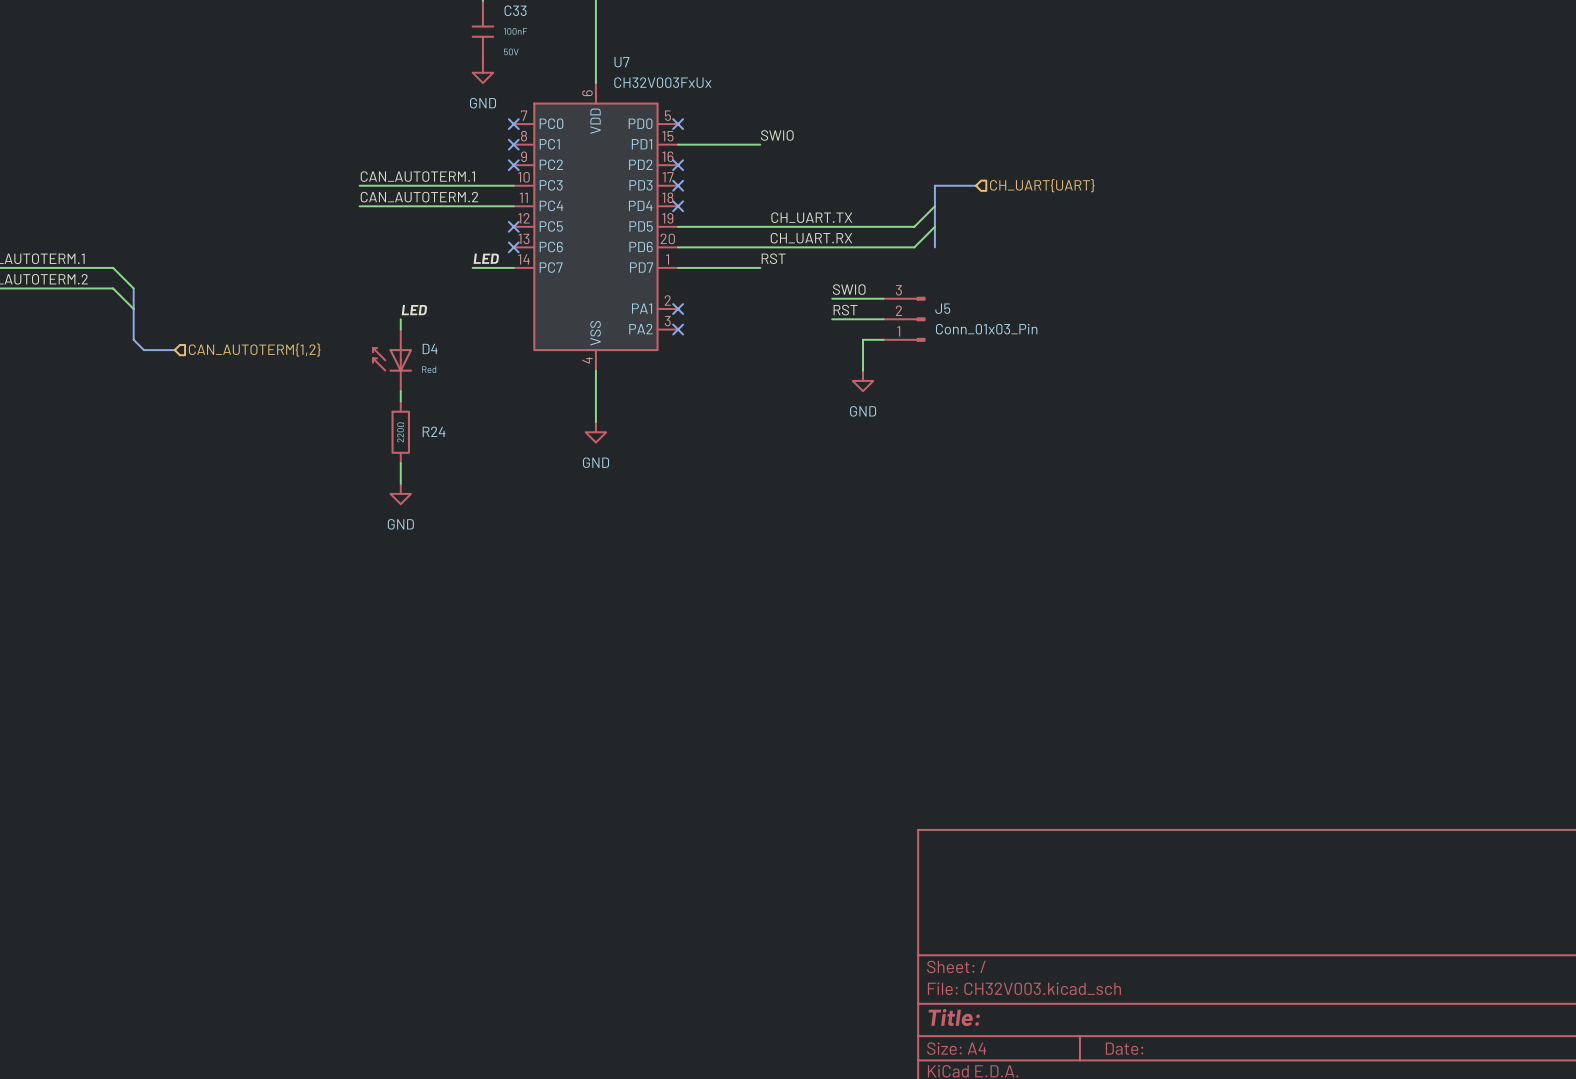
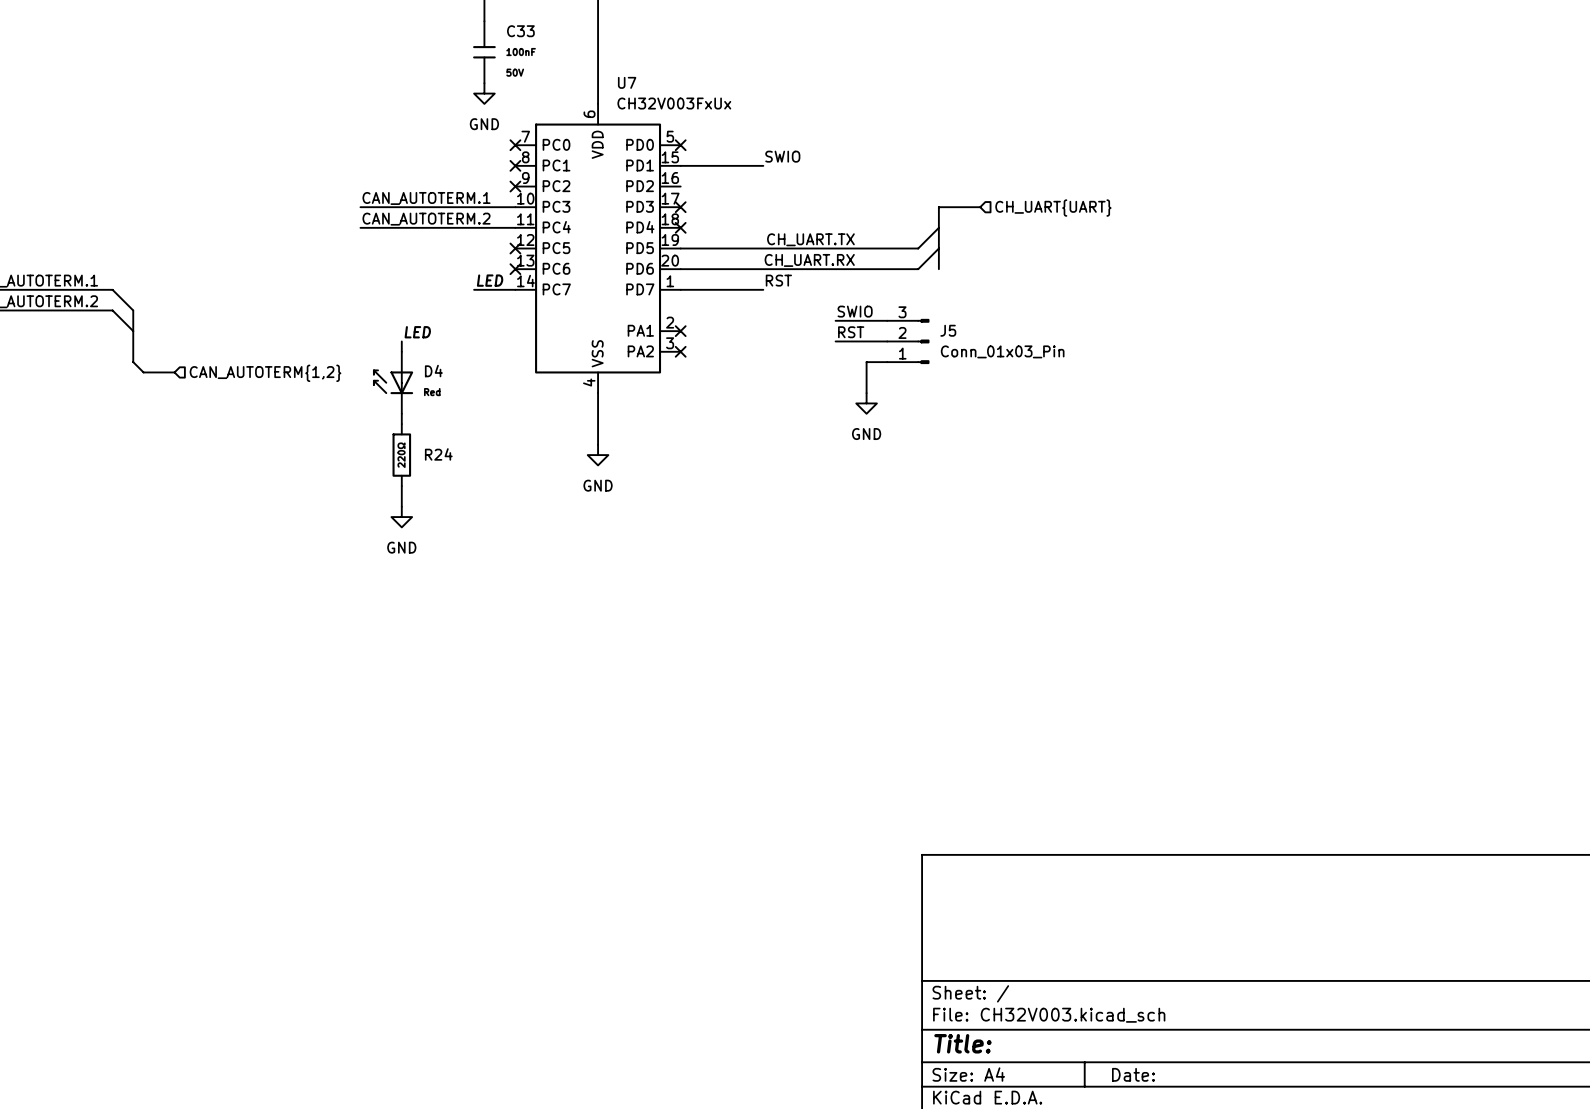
no-connect mark: (678, 165) -> none

